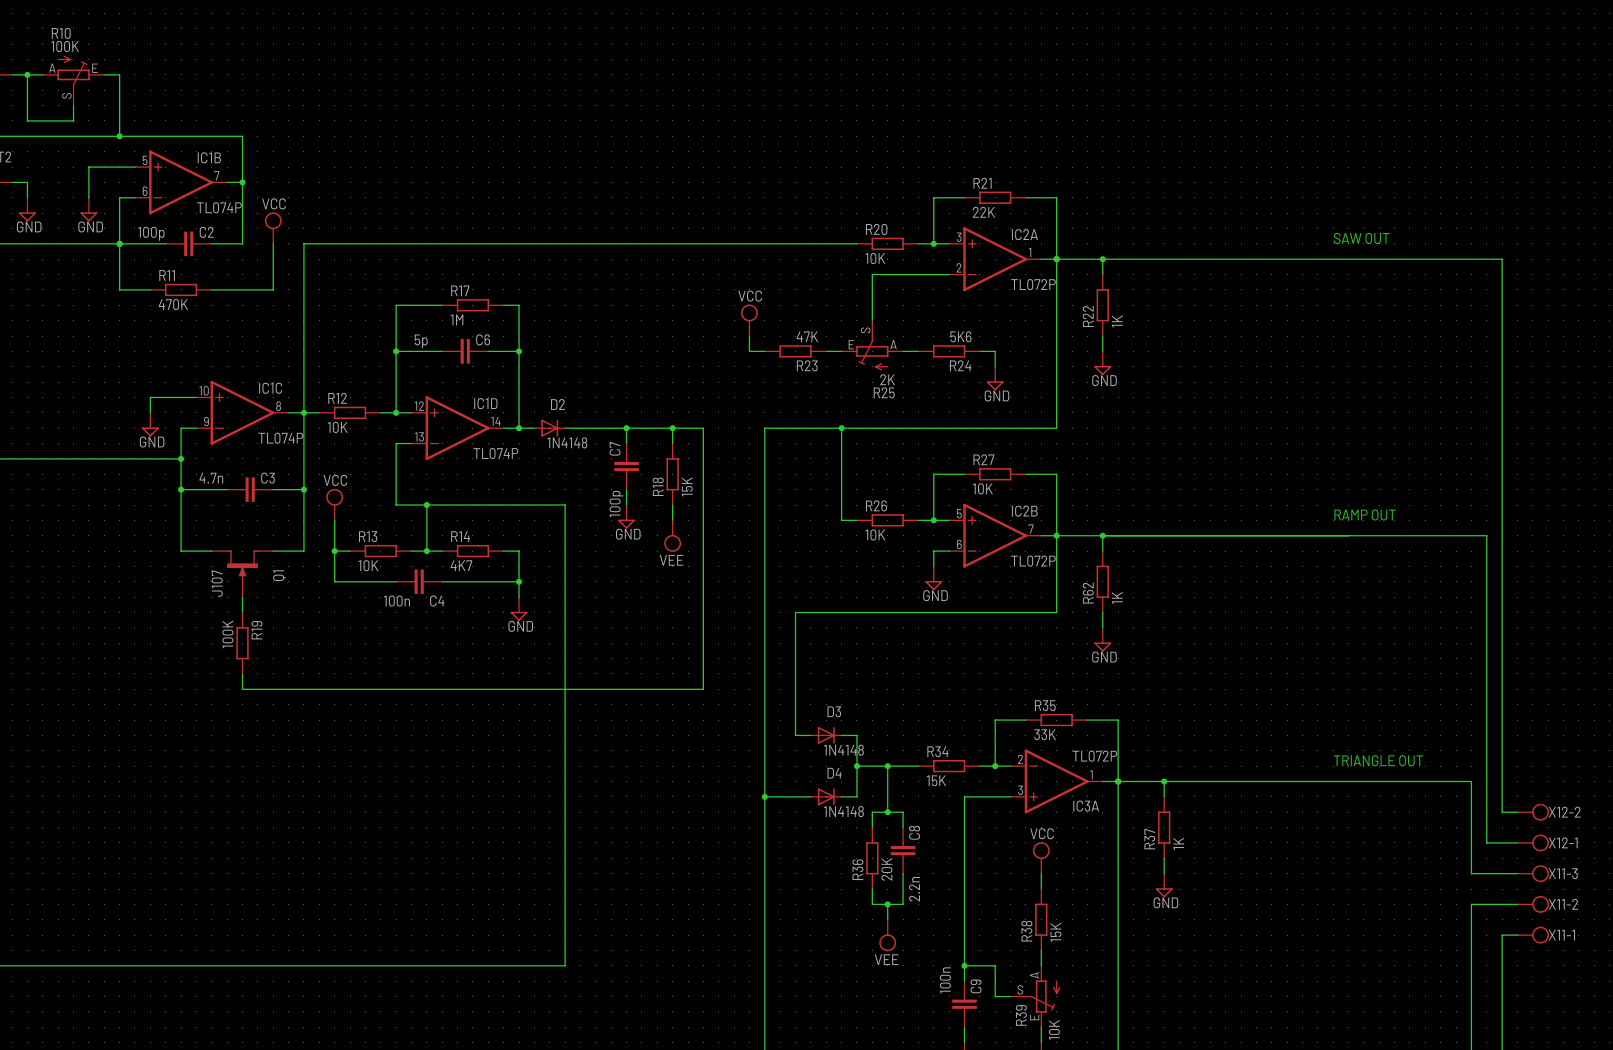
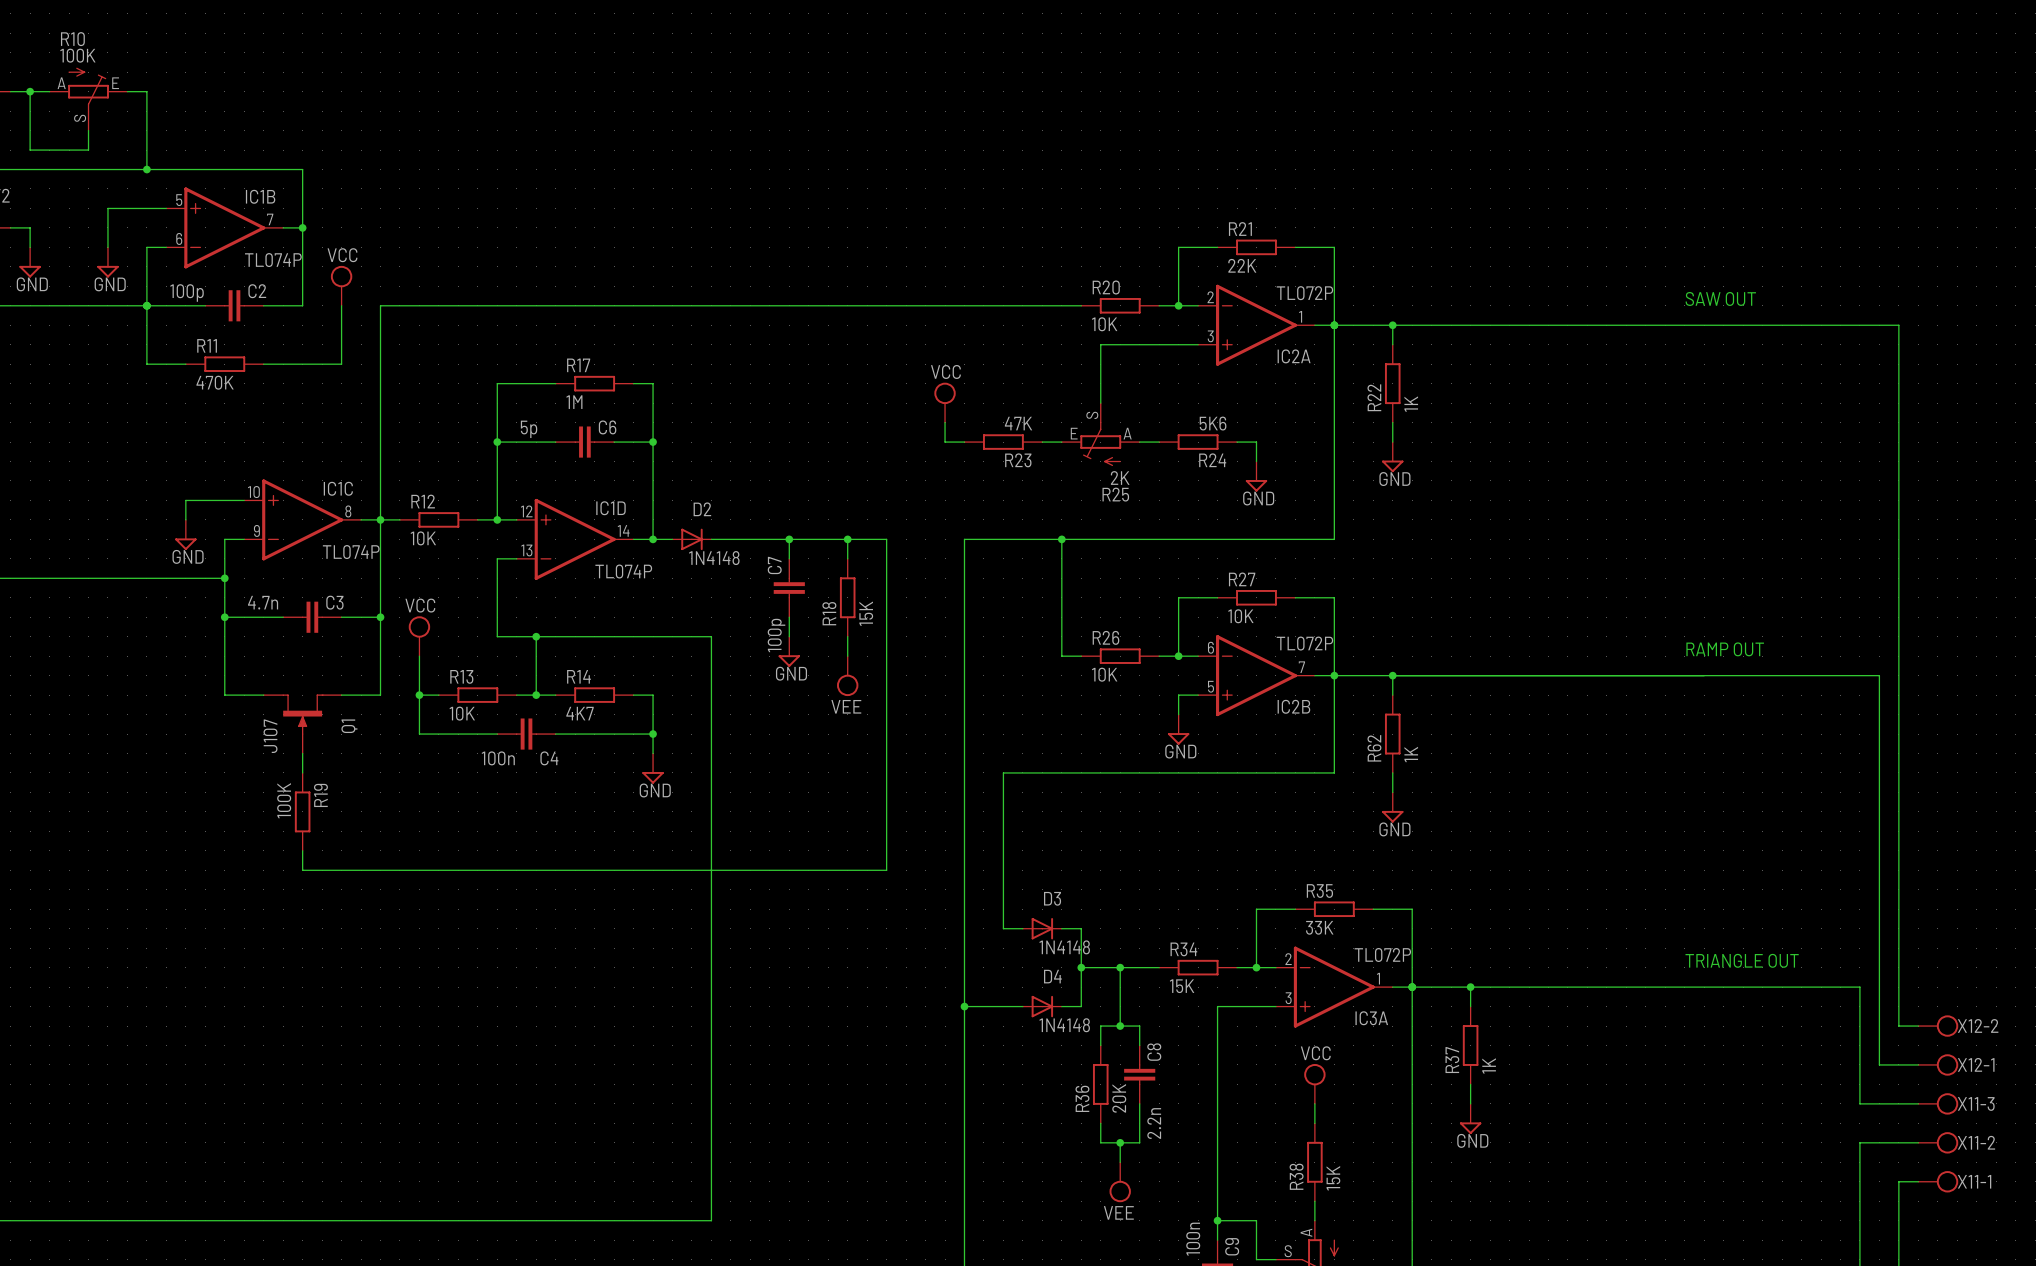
IC2A flip: as is (995, 259) -> up-down (1256, 325)
IC2B flip: as is (995, 535) -> up-down (1256, 675)

